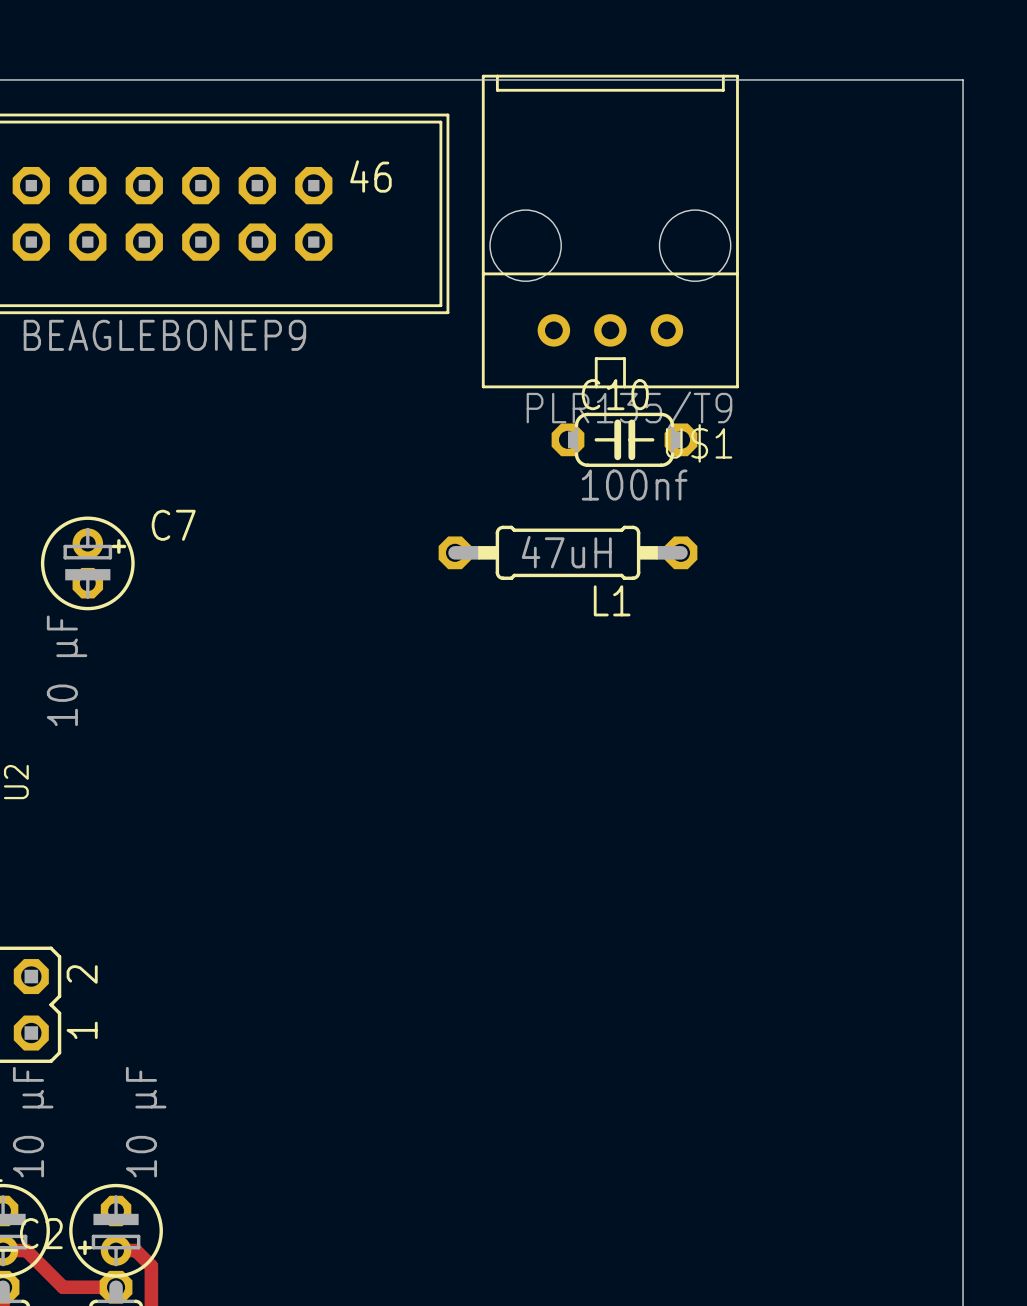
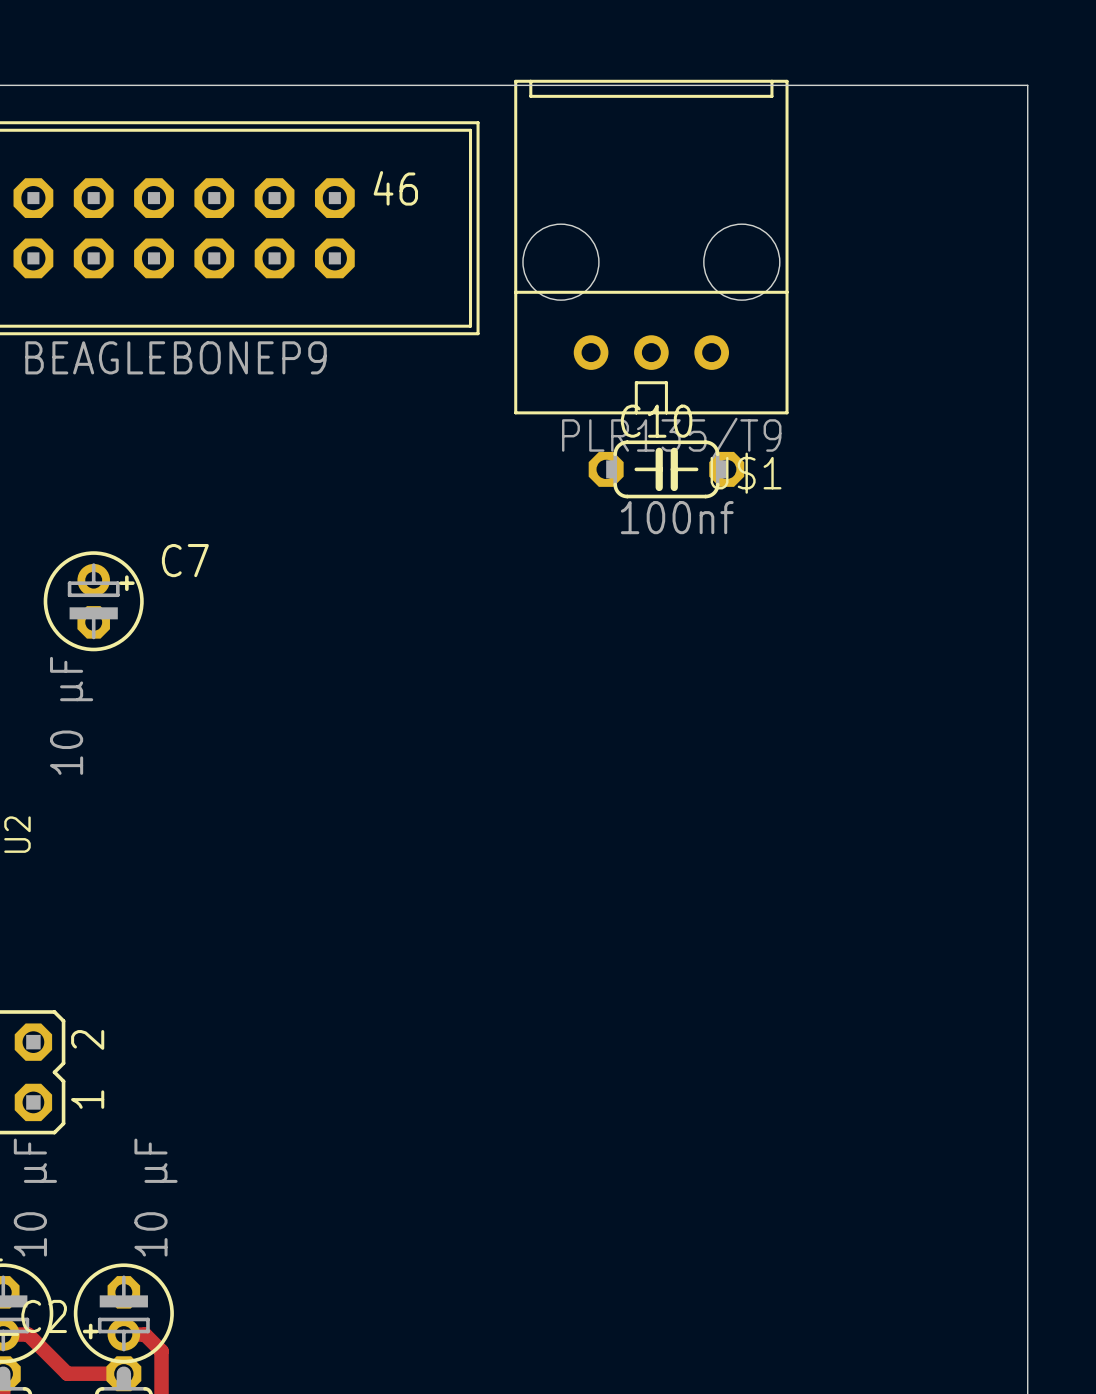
L1: 47uH (568, 552) -> none

